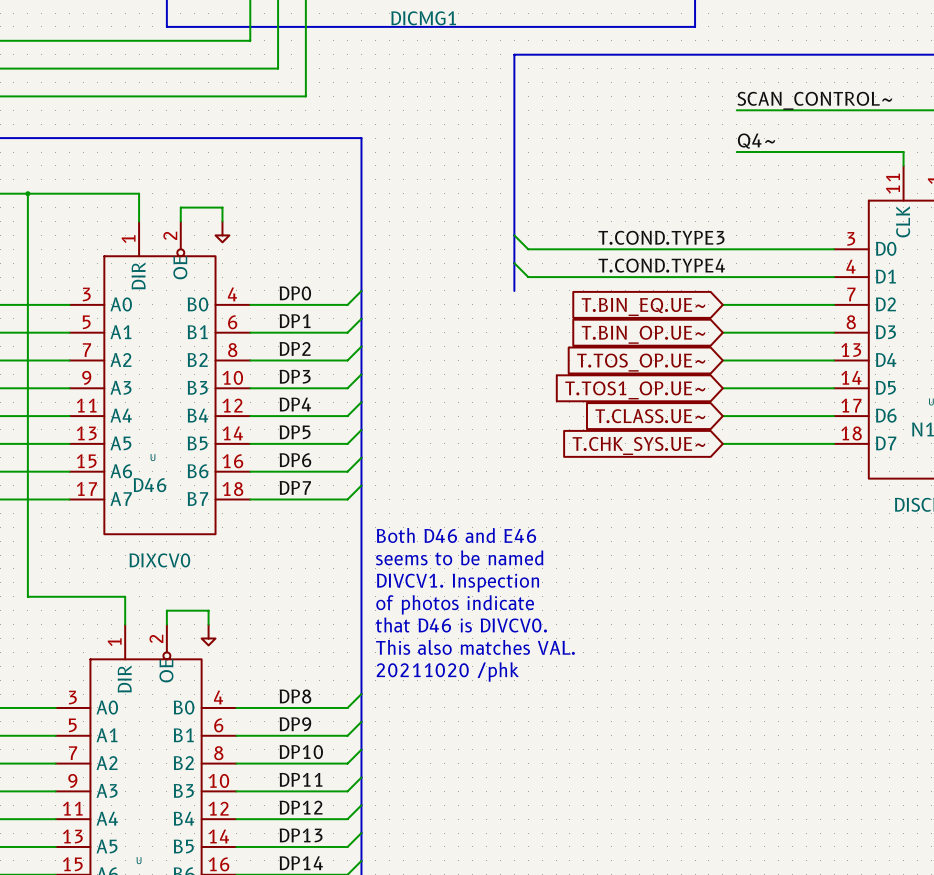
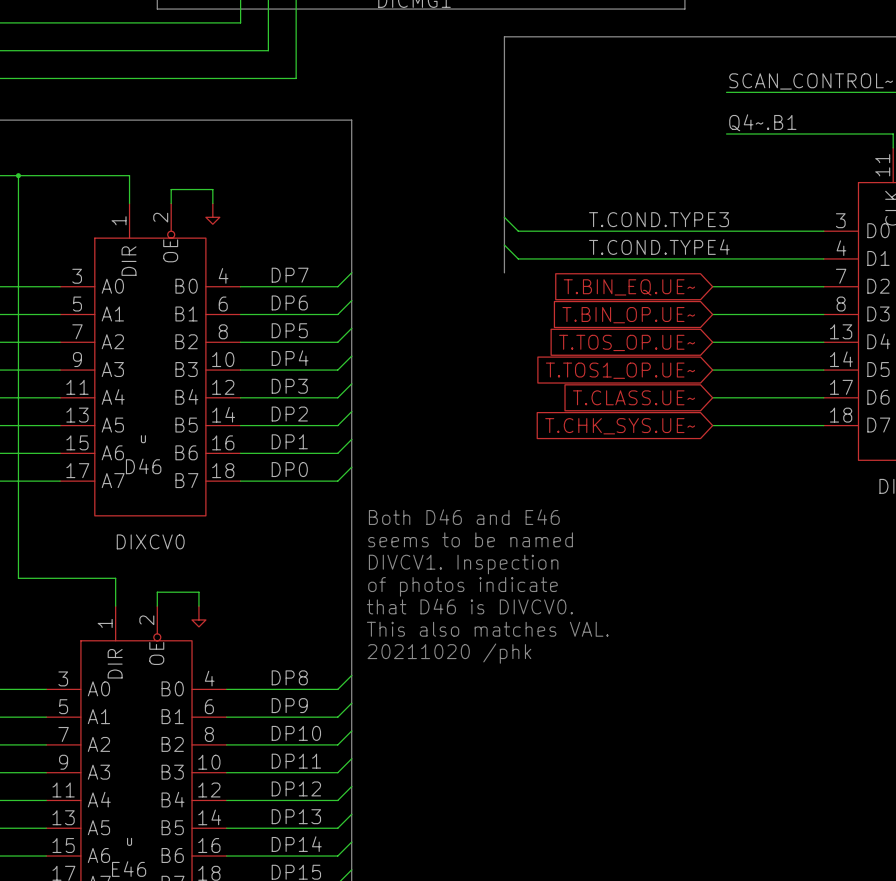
label: Q4~ (756, 141) -> Q4~.B1 (762, 122)
label: DP0 (295, 293) -> DP7 (290, 275)
label: DP1 (295, 321) -> DP6 (289, 302)
label: DP2 (295, 348) -> DP5 (289, 330)
label: DP3 (295, 376) -> DP4 (290, 358)
label: DP4 (295, 404) -> DP3 (289, 386)
label: DP5 (295, 432) -> DP2 (289, 414)
label: DP6 (295, 460) -> DP1 (289, 441)
label: DP7 (295, 487) -> DP0 (289, 469)

